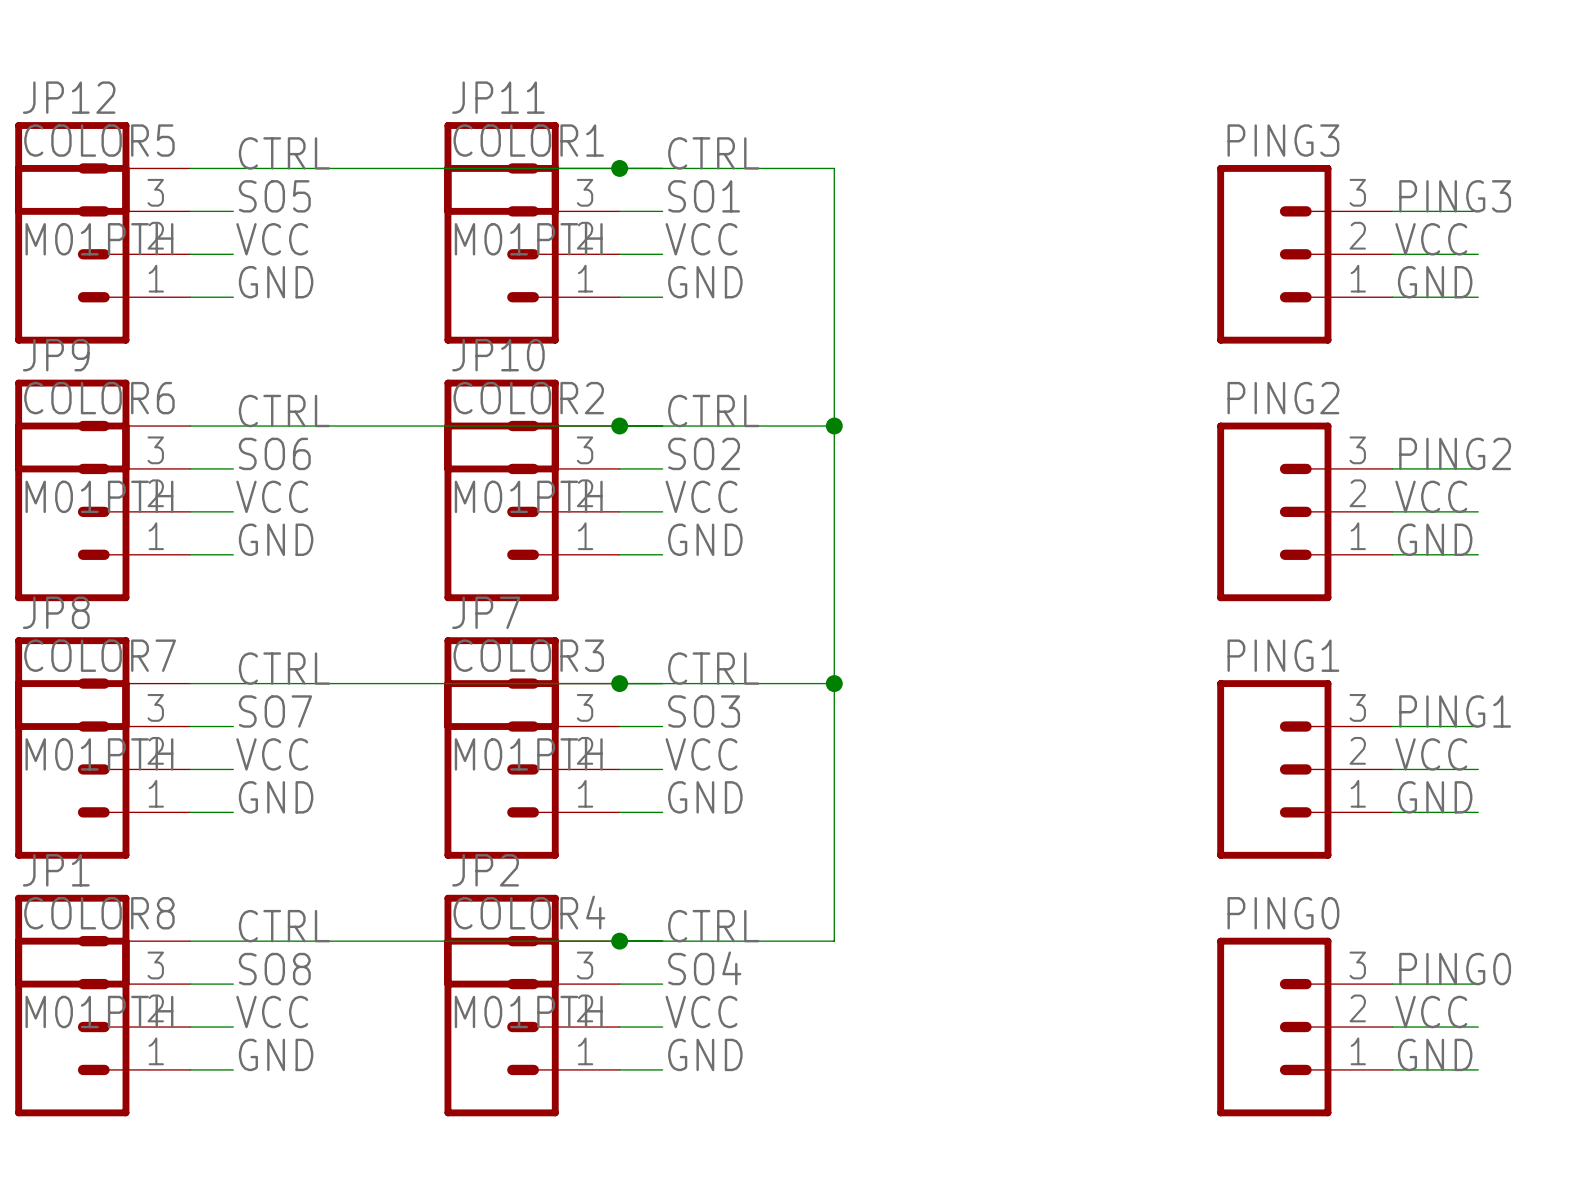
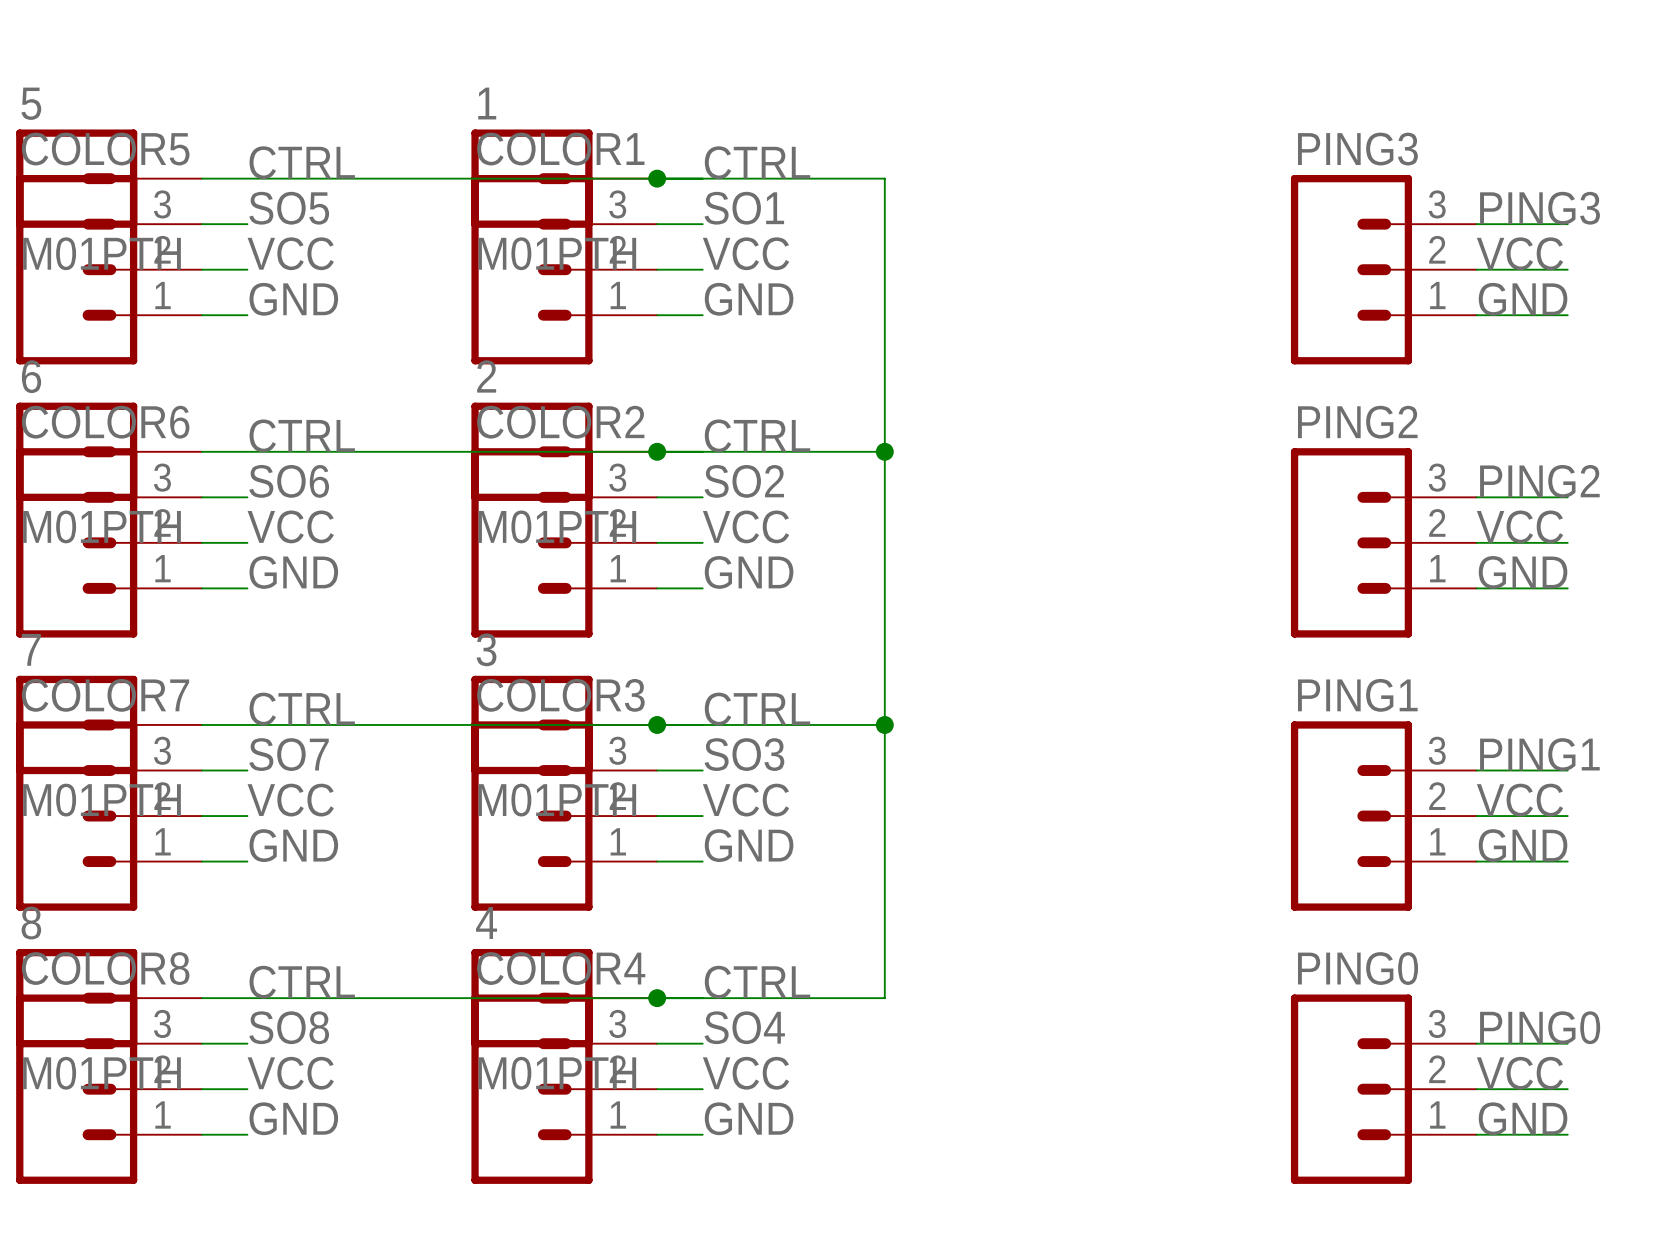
JP12 name: JP12 (69, 97) -> 5 (31, 103)
JP11 name: JP11 (498, 97) -> 1 (487, 103)
JP9 name: JP9 (56, 355) -> 6 (31, 376)
JP10 name: JP10 (498, 355) -> 2 (486, 376)
JP8 name: JP8 (56, 612) -> 7 (31, 649)
JP7 name: JP7 (486, 612) -> 3 (486, 649)
JP1 name: JP1 (56, 870) -> 8 (31, 923)
JP2 name: JP2 (485, 870) -> 4 (486, 923)

